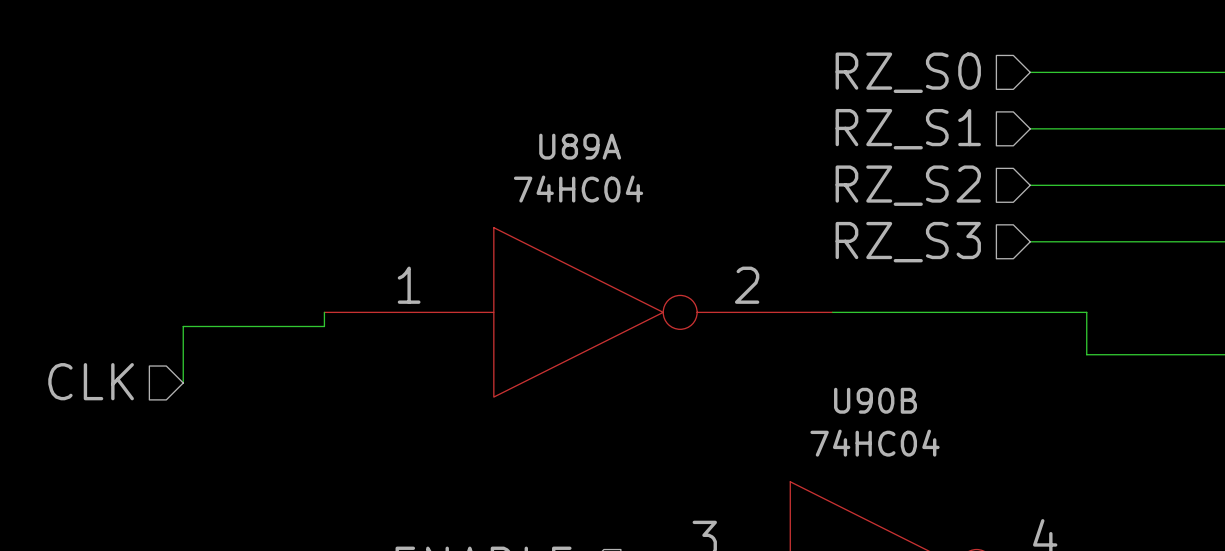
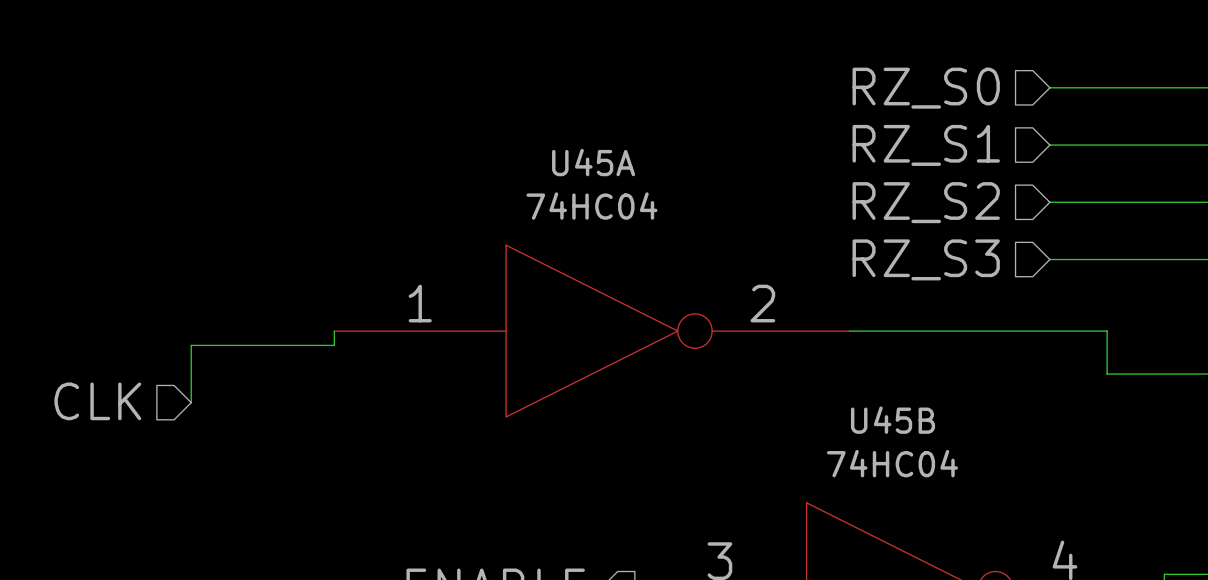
U89A name: U89A (580, 146) -> U45A (593, 162)
U90B name: U90B (875, 400) -> U45B (893, 420)

